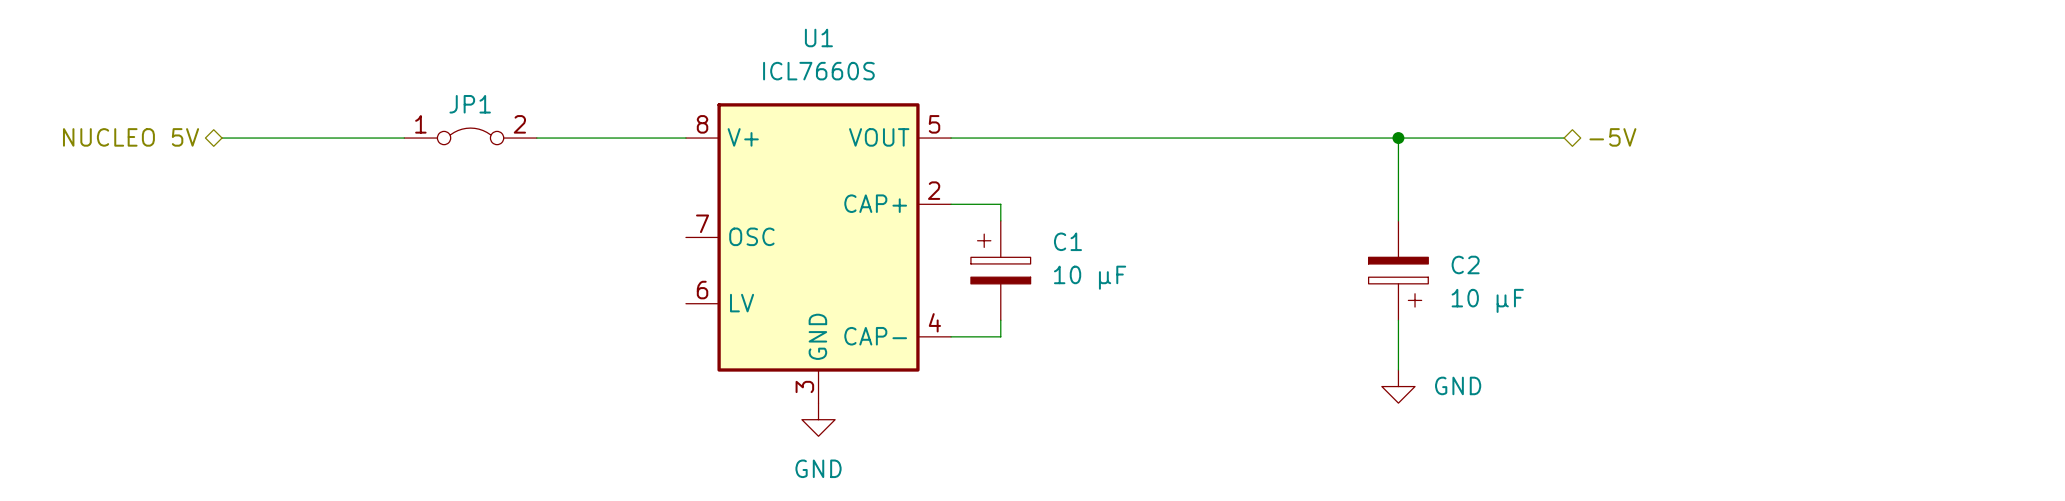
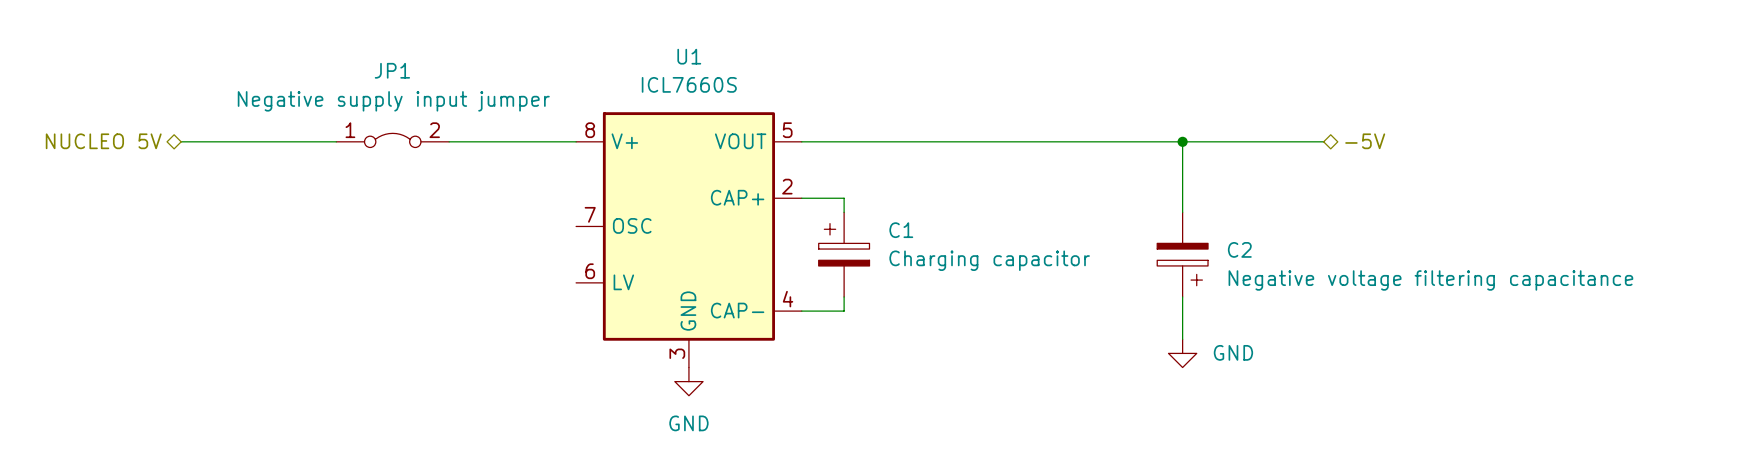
JP1 value: none -> Negative supply input jumper (393, 101)
JP1 name position: JP1 (470, 104) -> JP1 (392, 70)
C1 value: 10 µF (1090, 277) -> Charging capacitor (989, 260)
C2 value: 10 µF (1487, 300) -> Negative voltage filtering capacitance (1430, 280)

